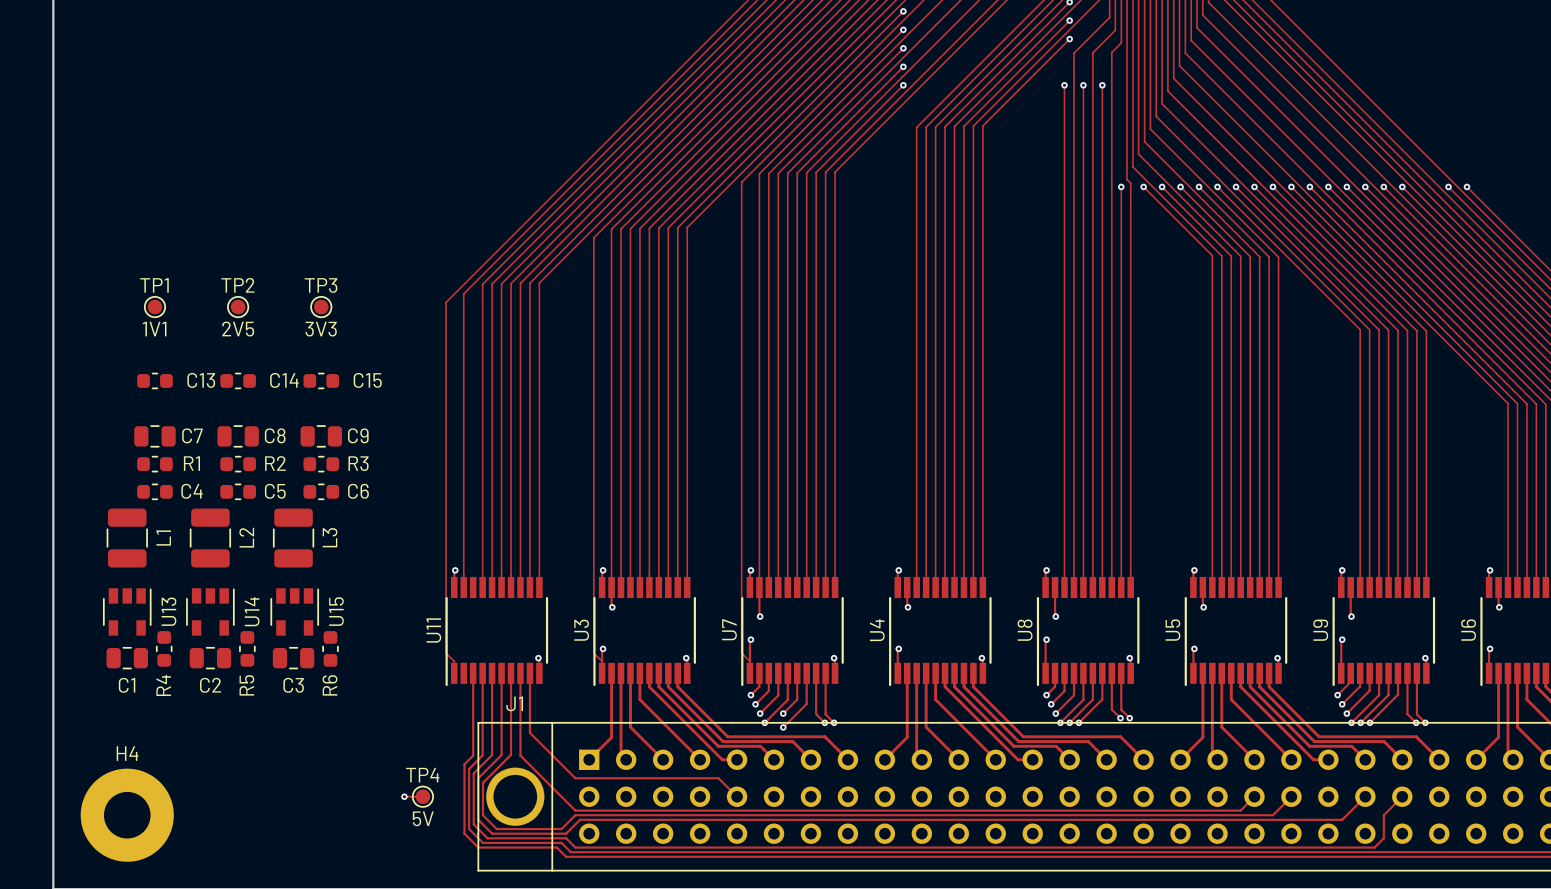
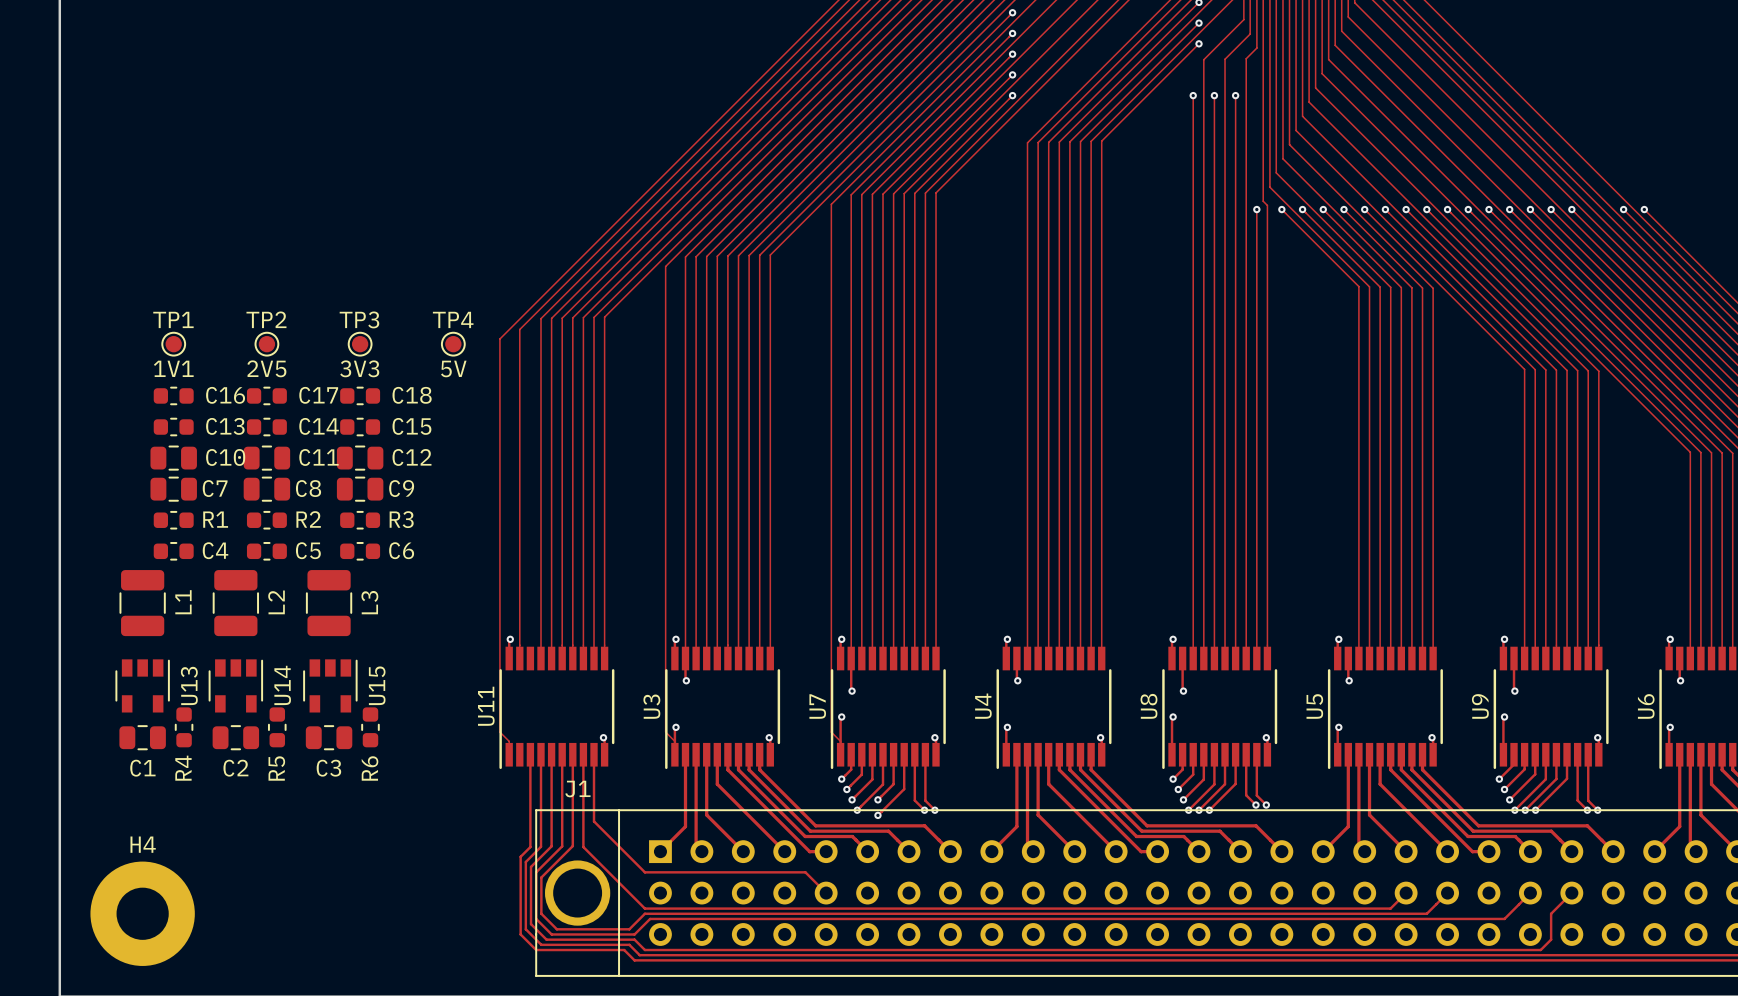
C16: none -> (173, 395)
C17: none -> (266, 395)
C18: none -> (360, 395)
C10: none -> (173, 458)
C11: none -> (266, 458)
C12: none -> (360, 458)
track: (404, 796) (422, 796) -> none
via: (404, 796) -> none
TP4 position: (422, 796) -> (453, 344)

